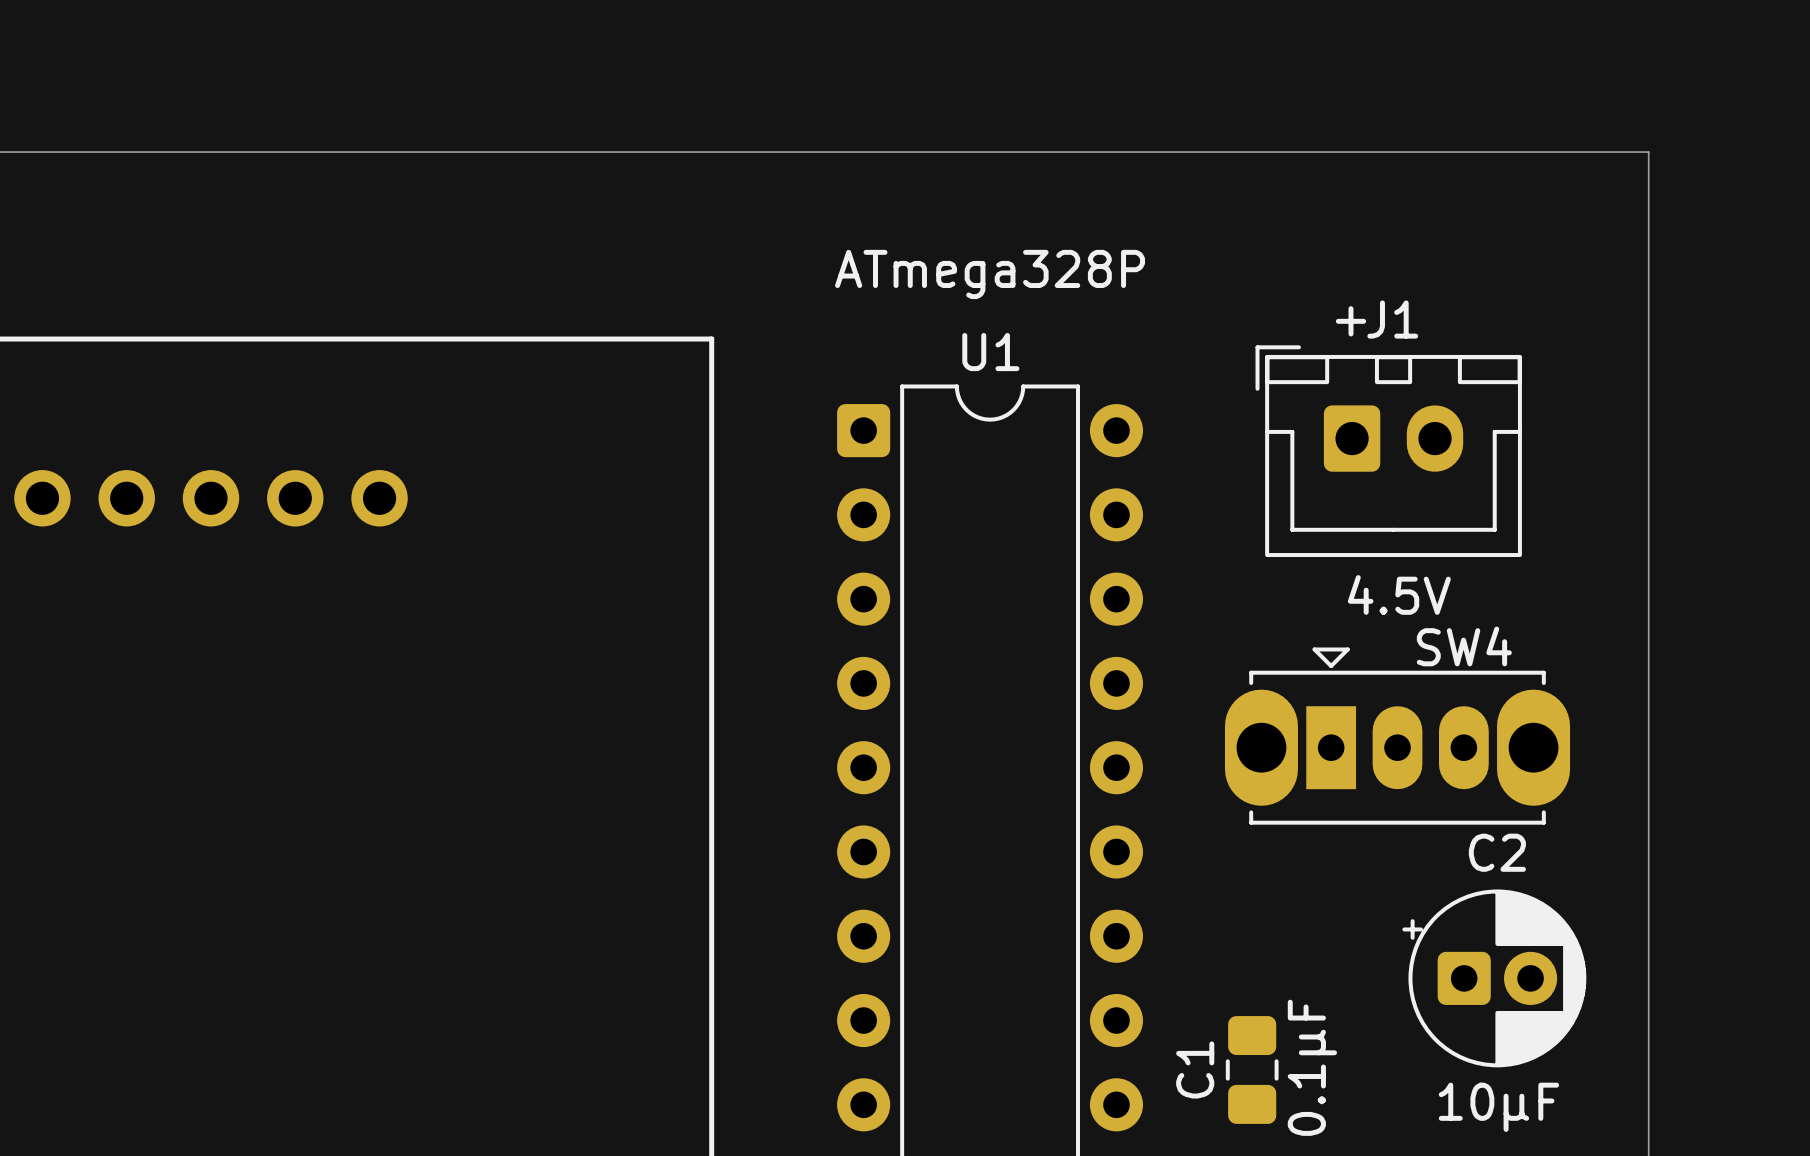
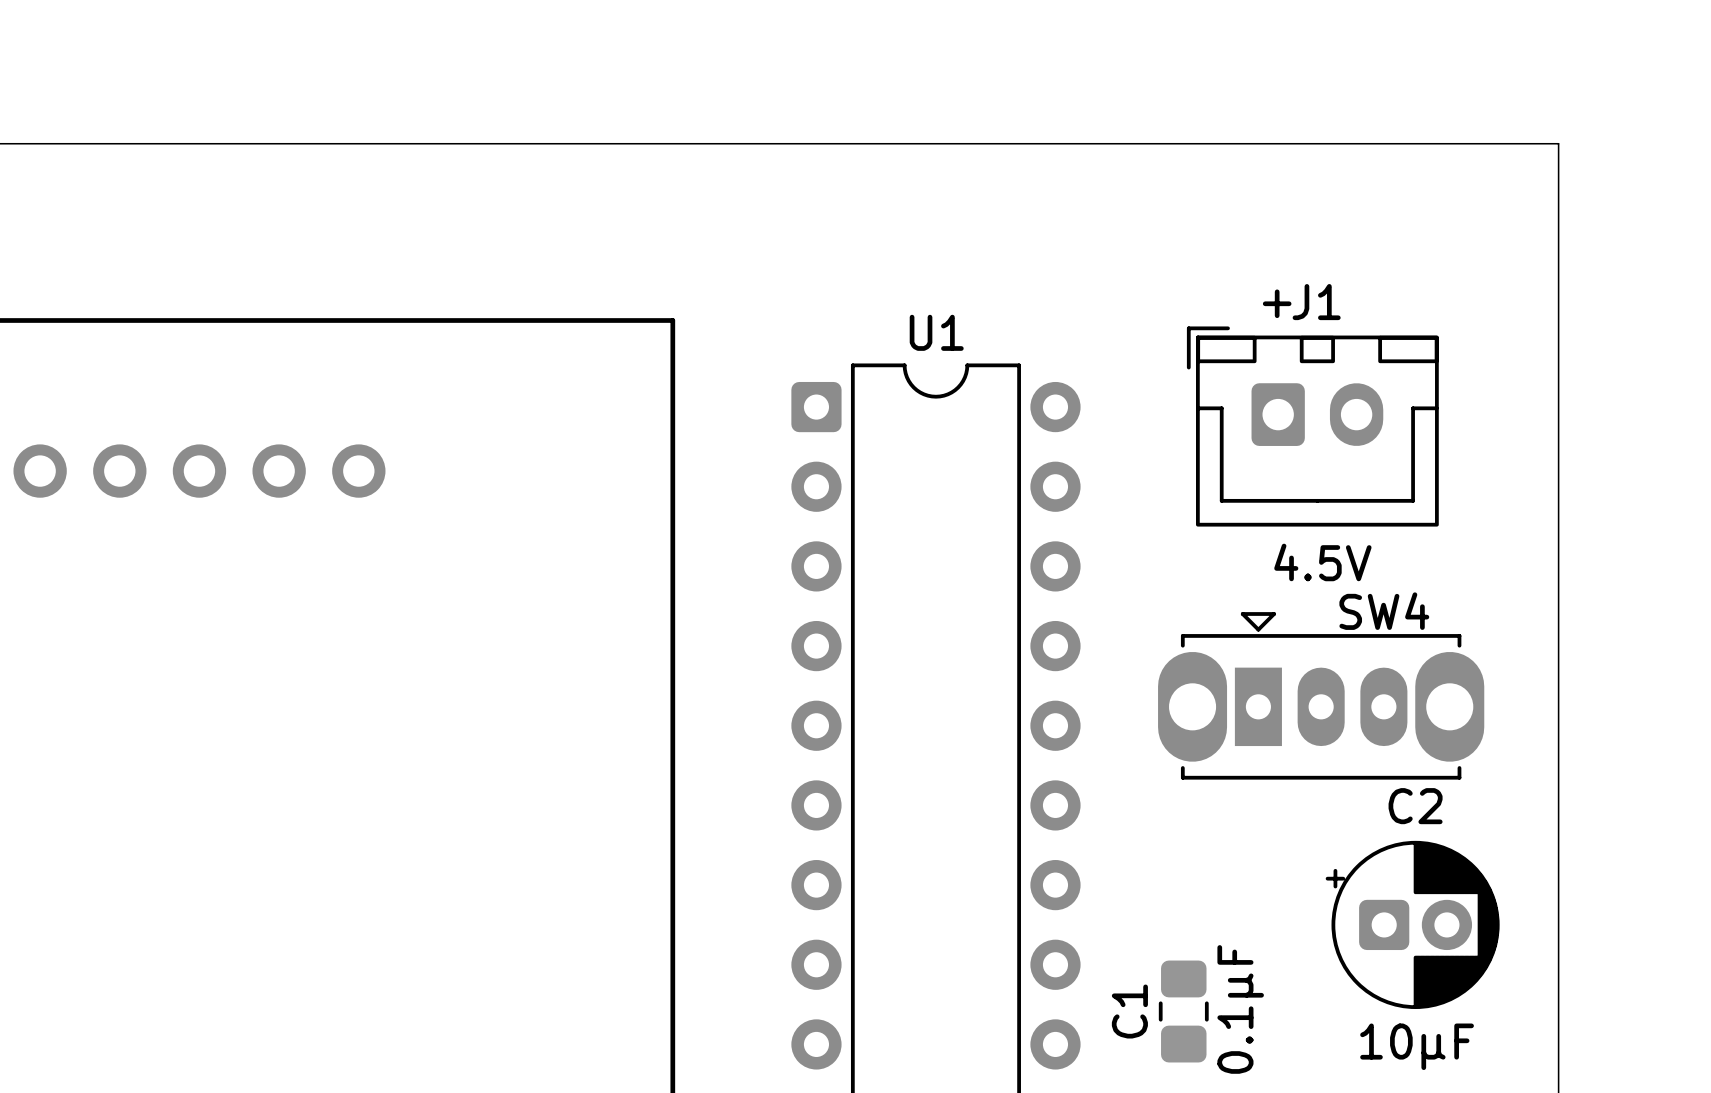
text: ATmega328P (990, 274) -> none

